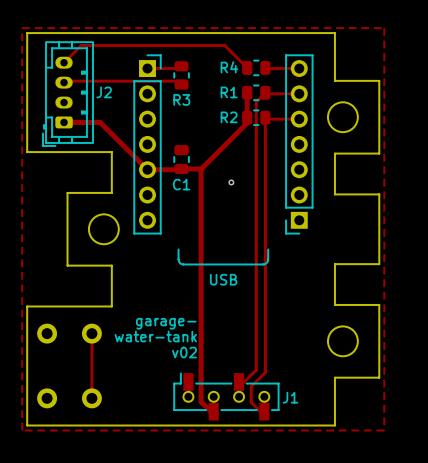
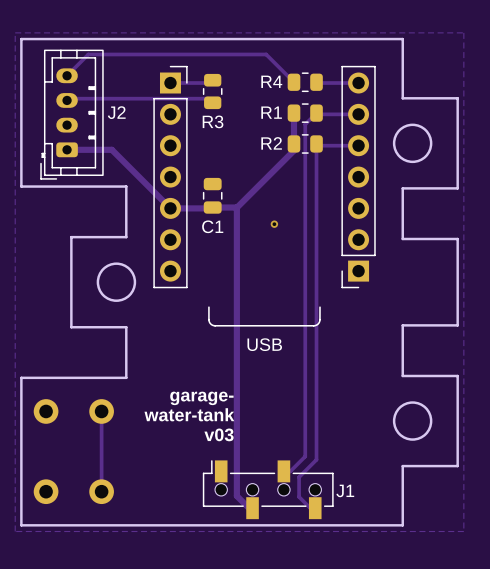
text: v02 (184, 352) -> v03 (219, 434)

